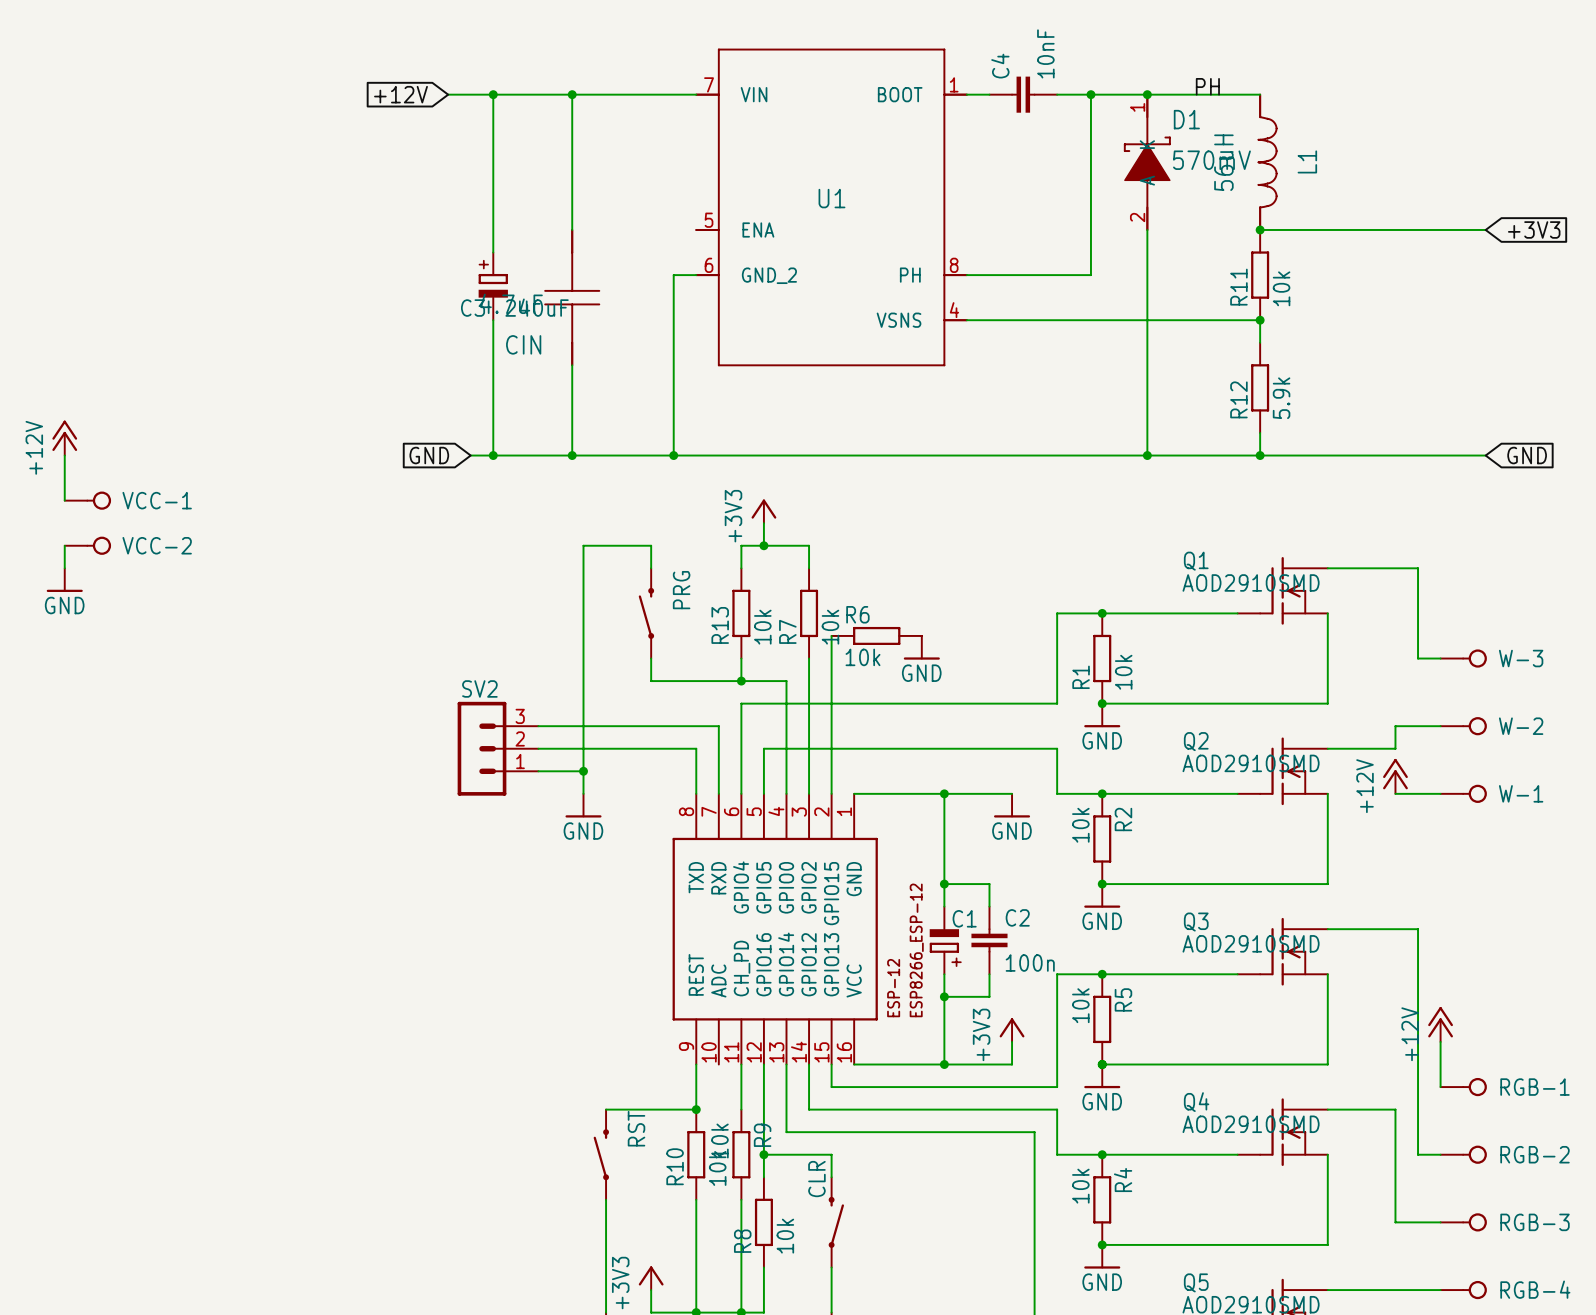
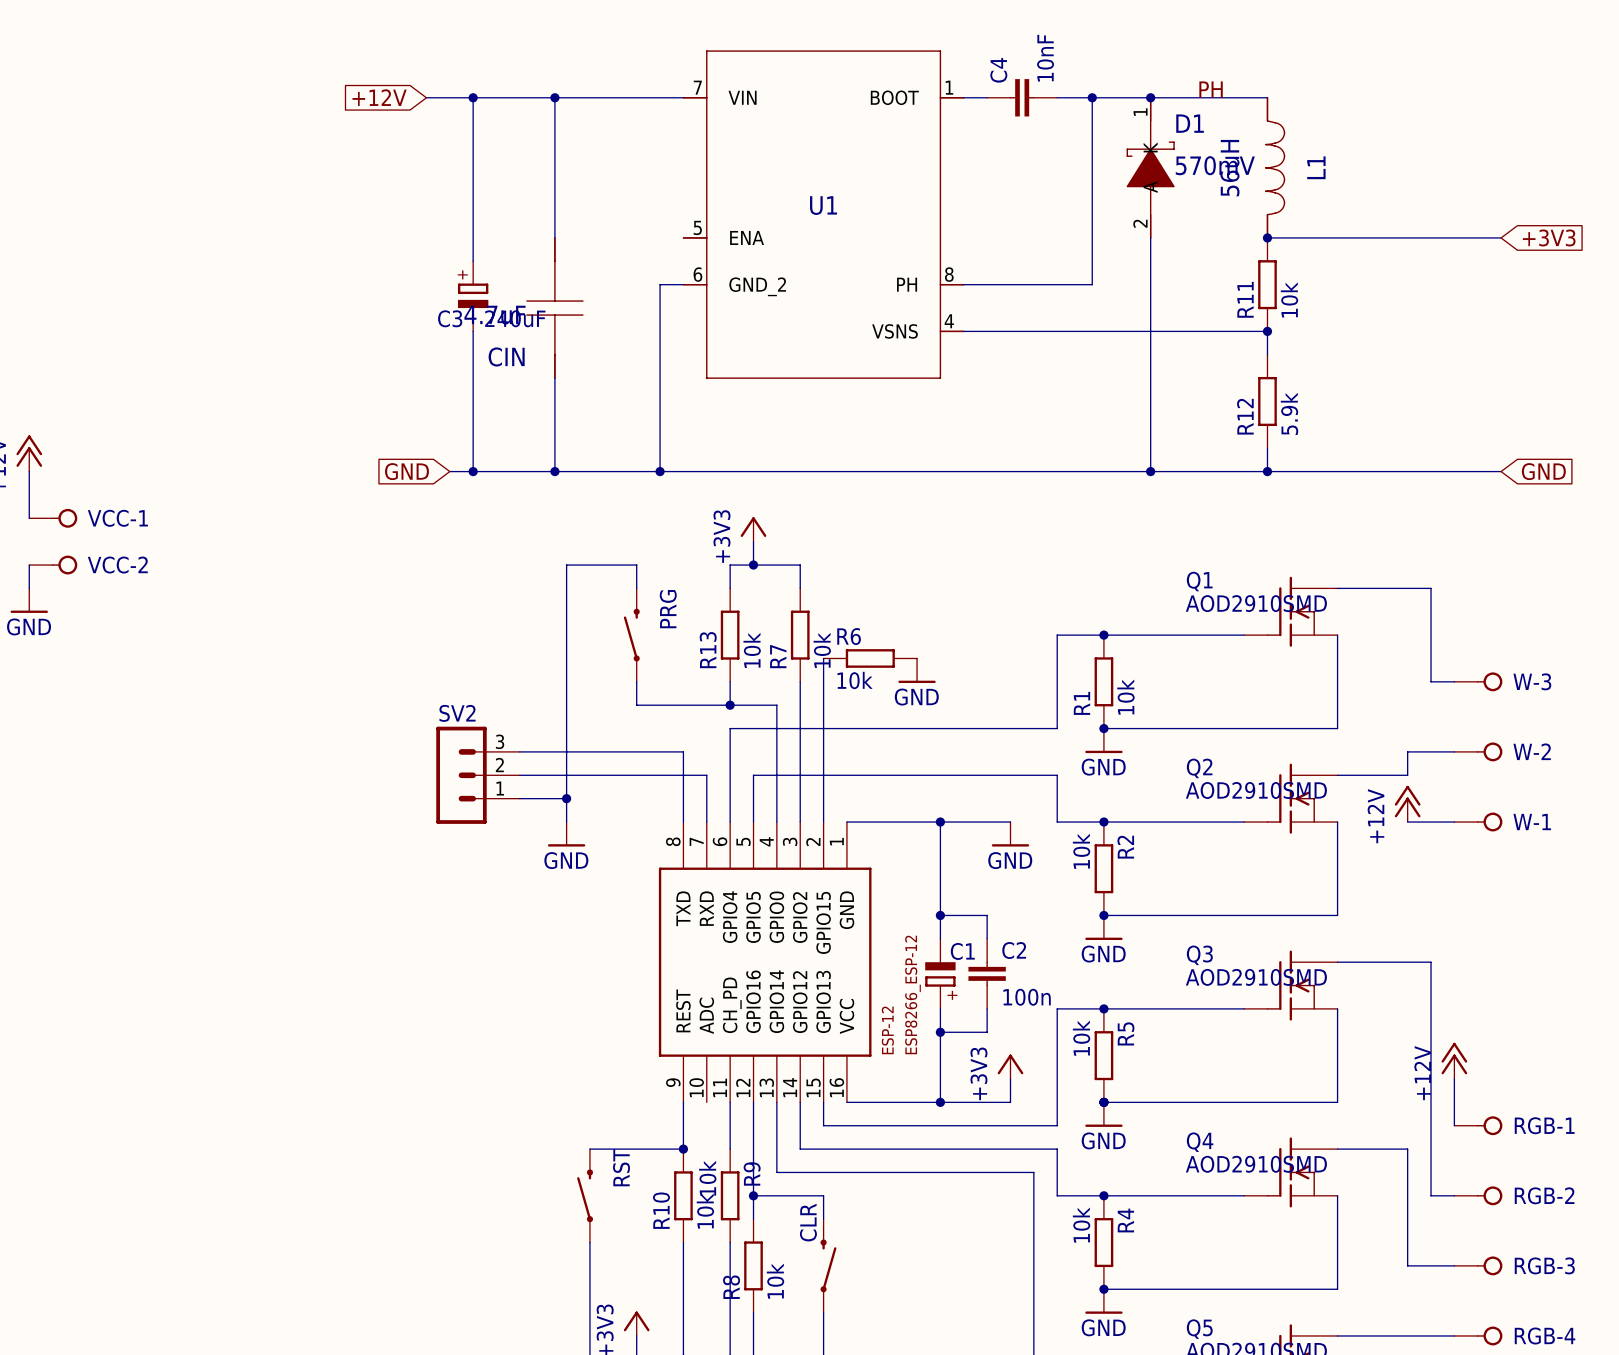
wire: (696, 726) (718, 726) (718, 748) -> (683, 751) (683, 775) (706, 775)

